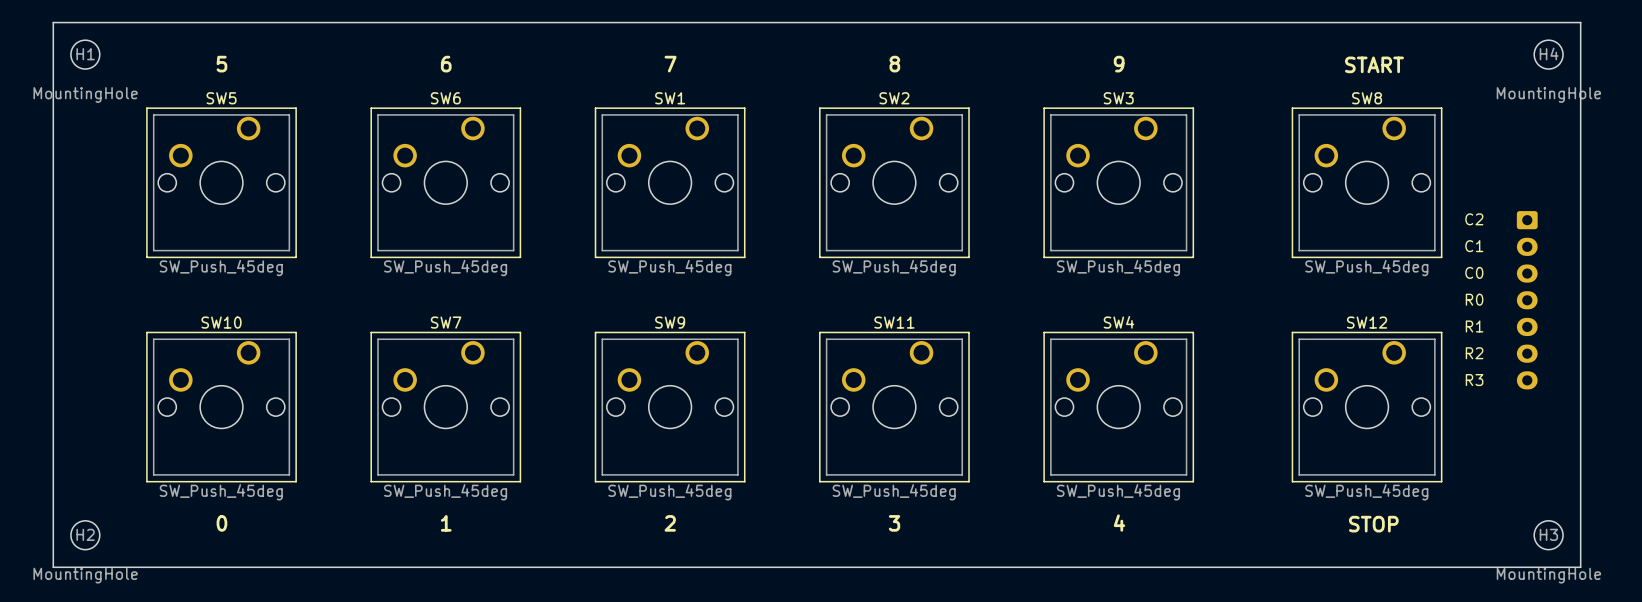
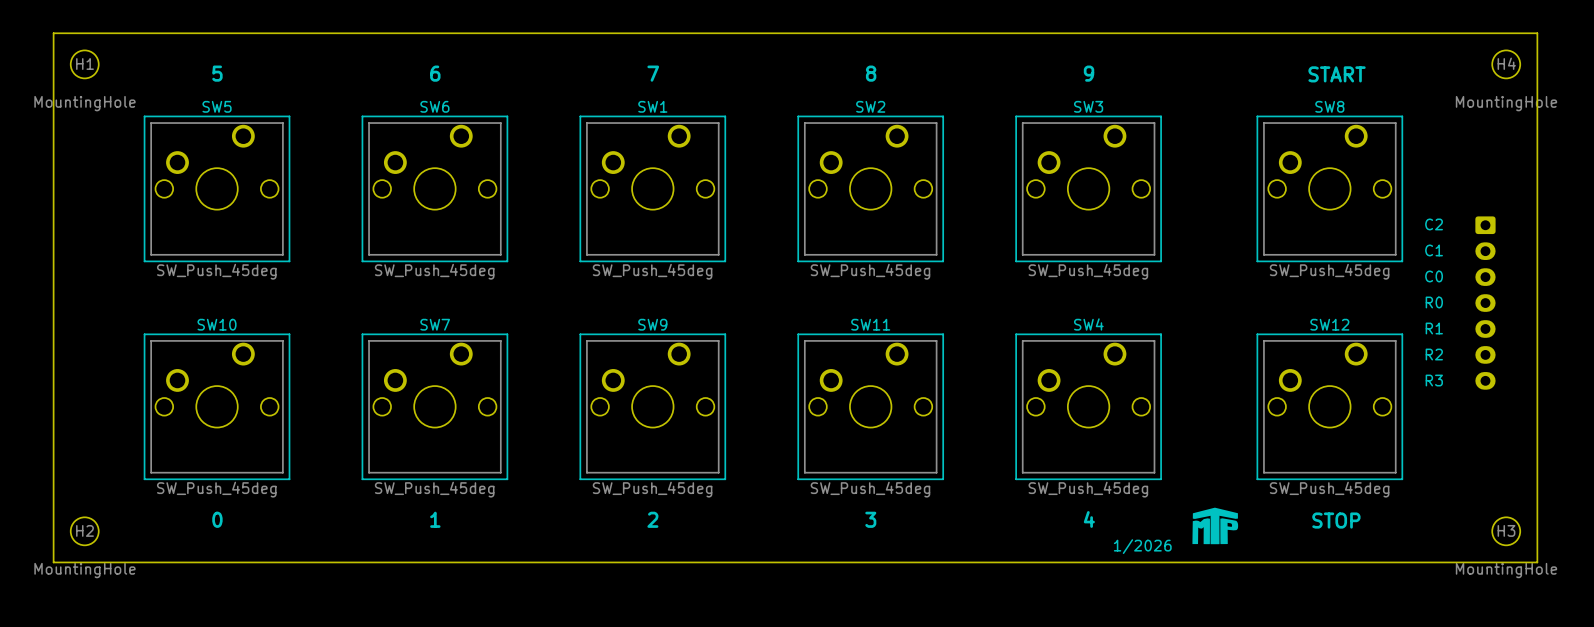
drawing: none -> [1192, 507, 1239, 545]
text: none -> 1/2026 (1142, 546)

